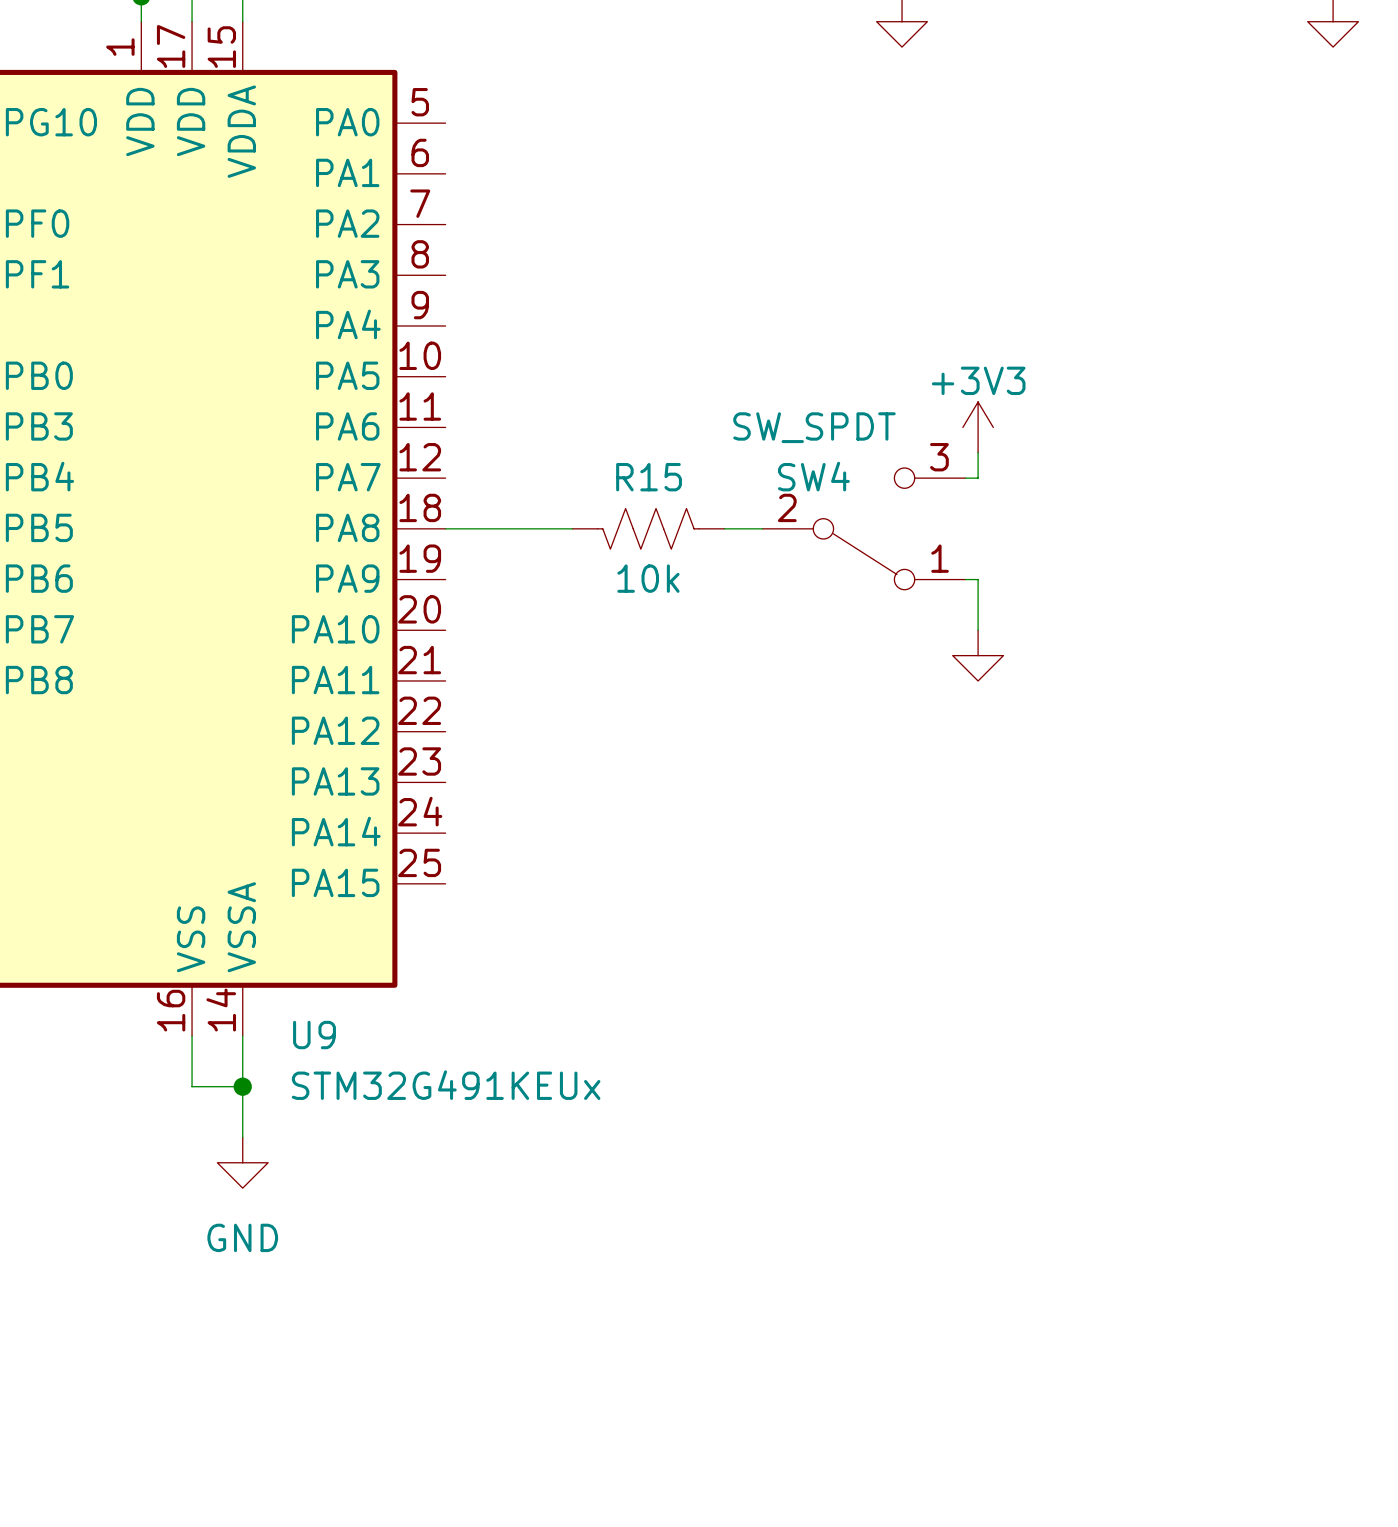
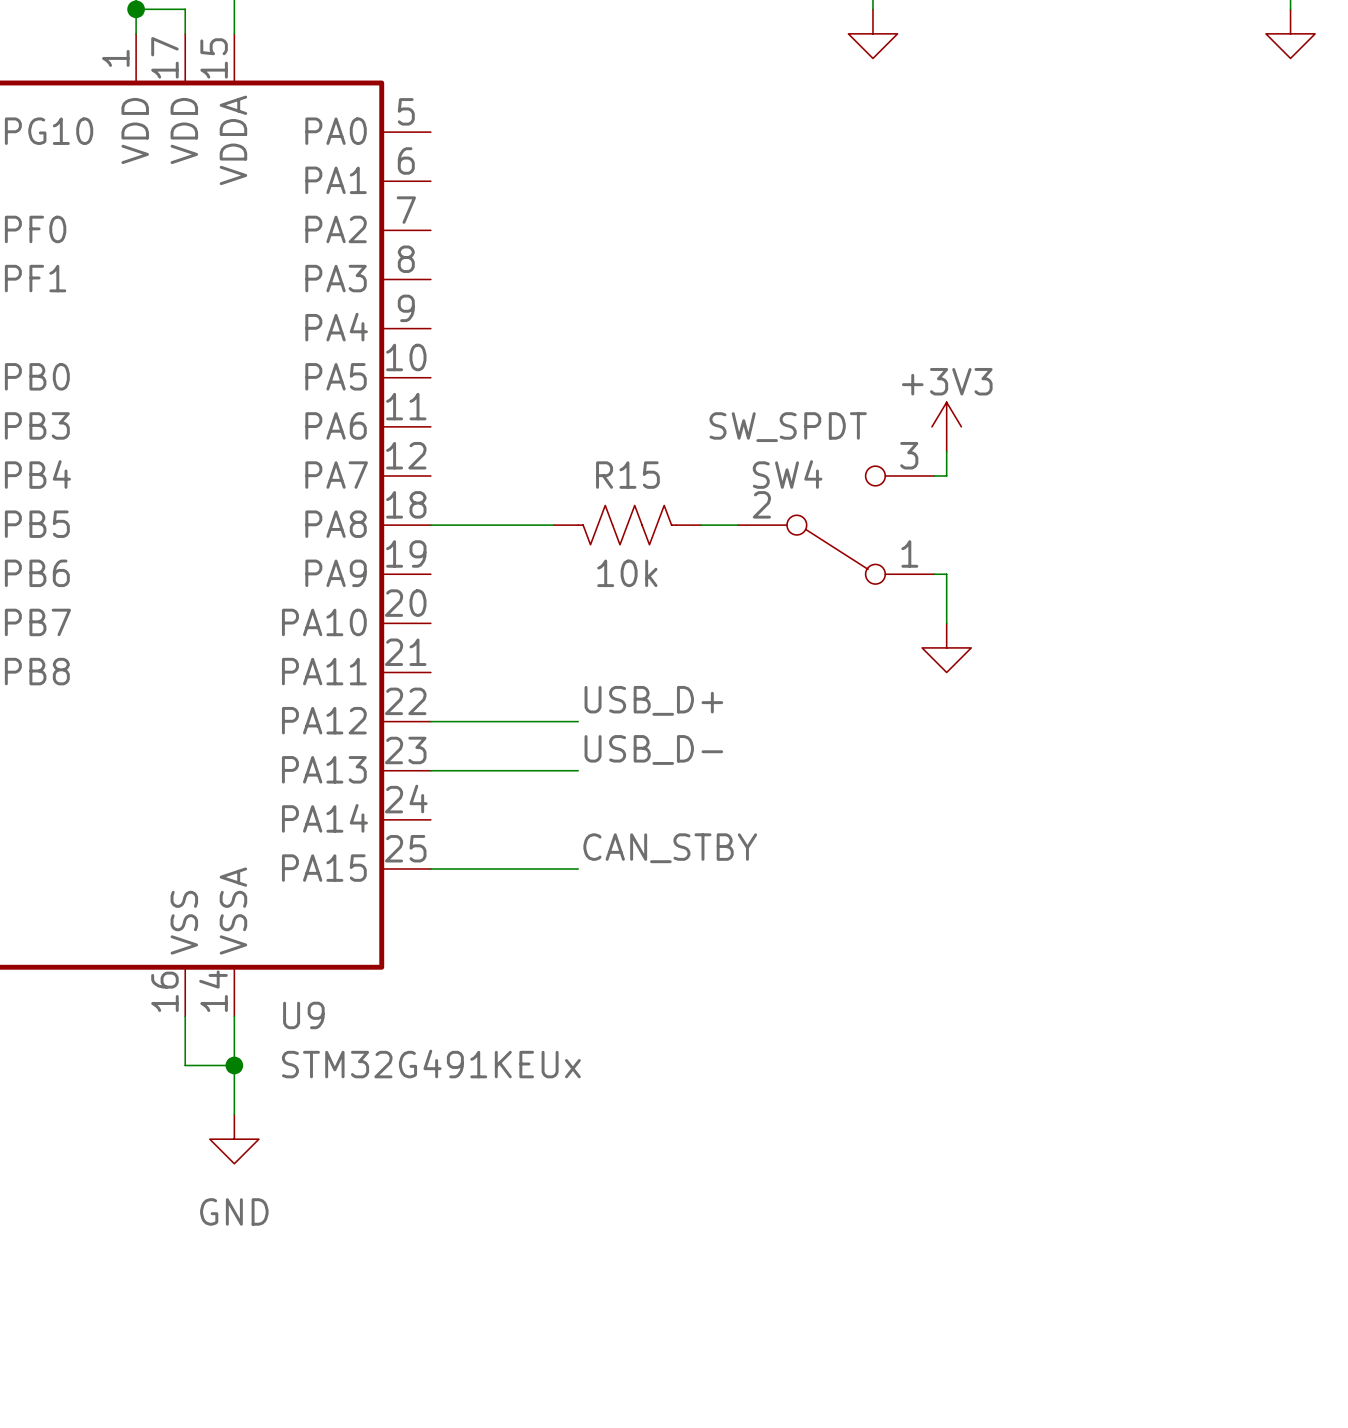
label: none -> USB_D+ (653, 700)
wire: none -> (430, 721) (578, 721)
label: none -> USB_D- (653, 749)
wire: none -> (430, 770) (578, 770)
label: none -> CAN_STBY (670, 848)
wire: none -> (430, 868) (578, 868)

